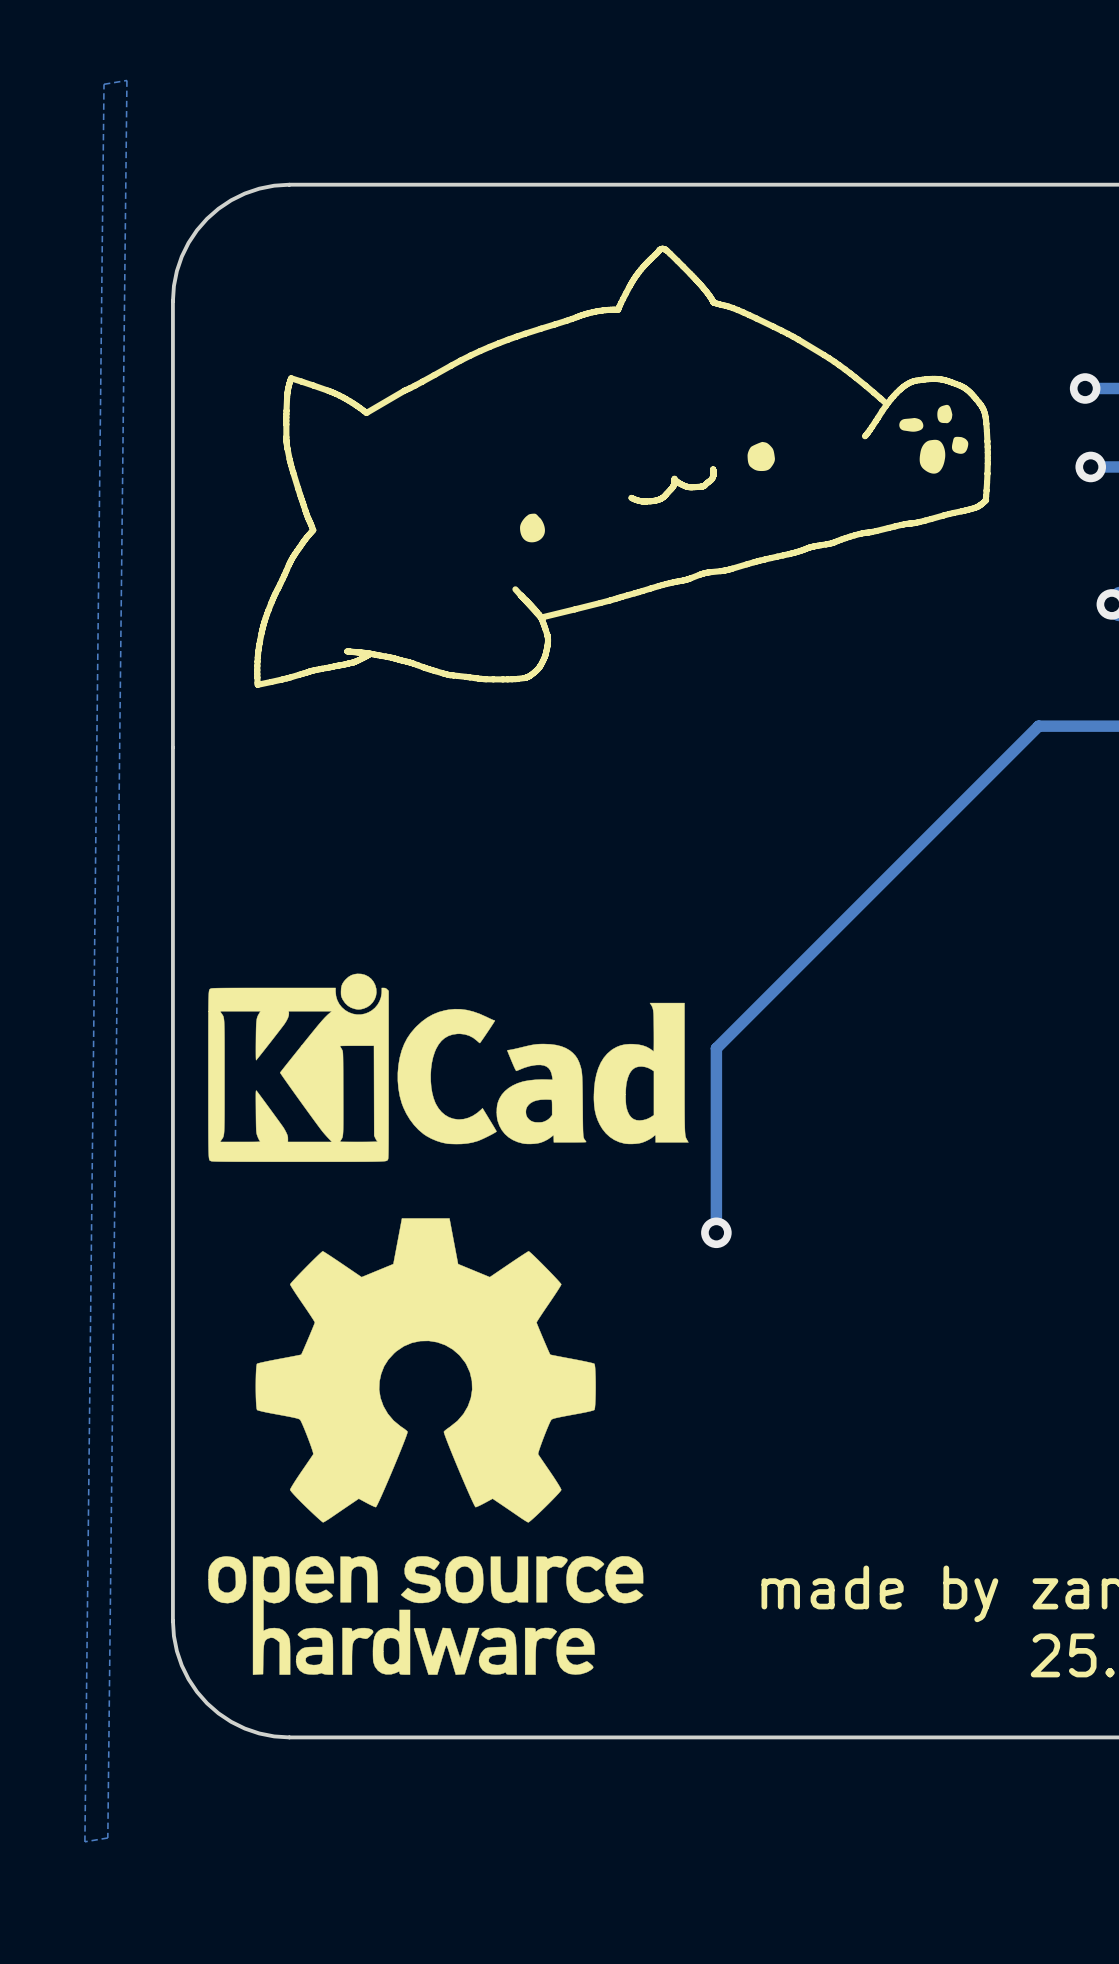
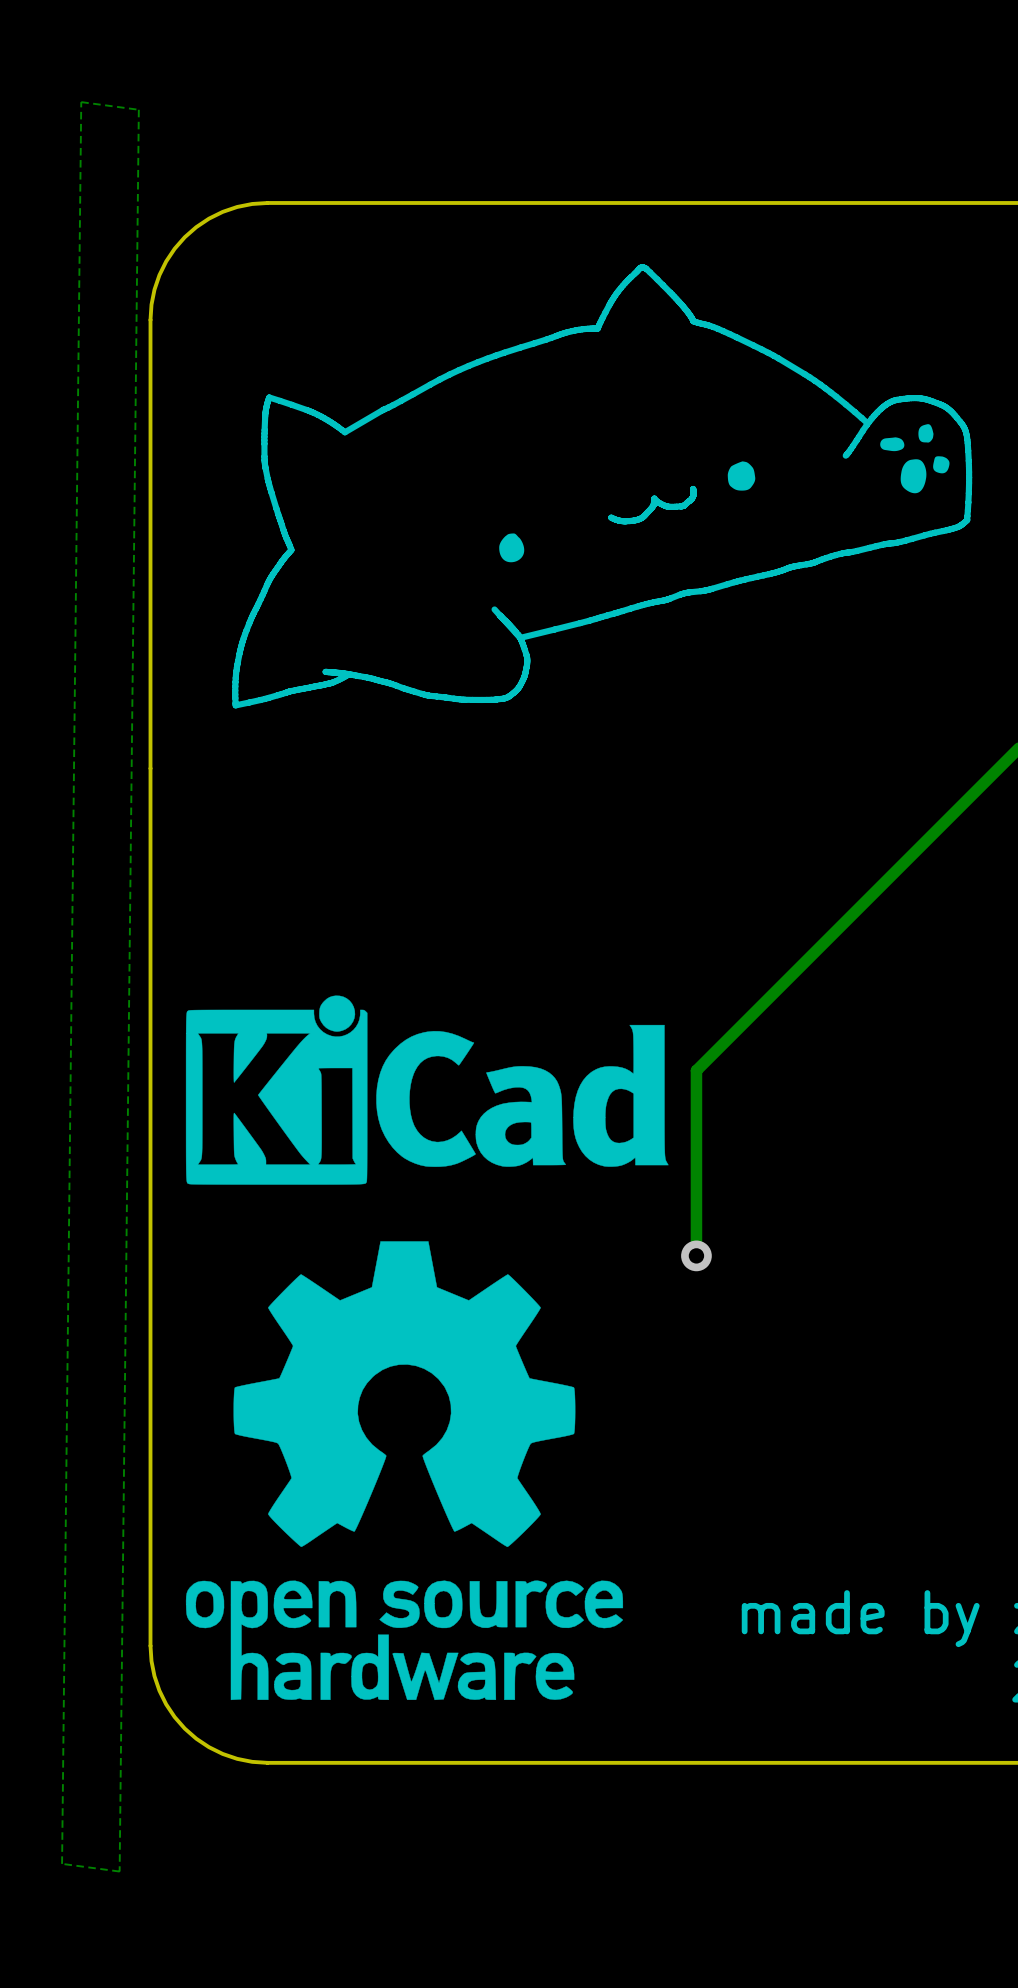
zone outline: (104, 84) (126, 80) (107, 1837) (84, 1841) (84, 1837) -> (81, 102) (138, 109) (119, 1871) (62, 1863)

